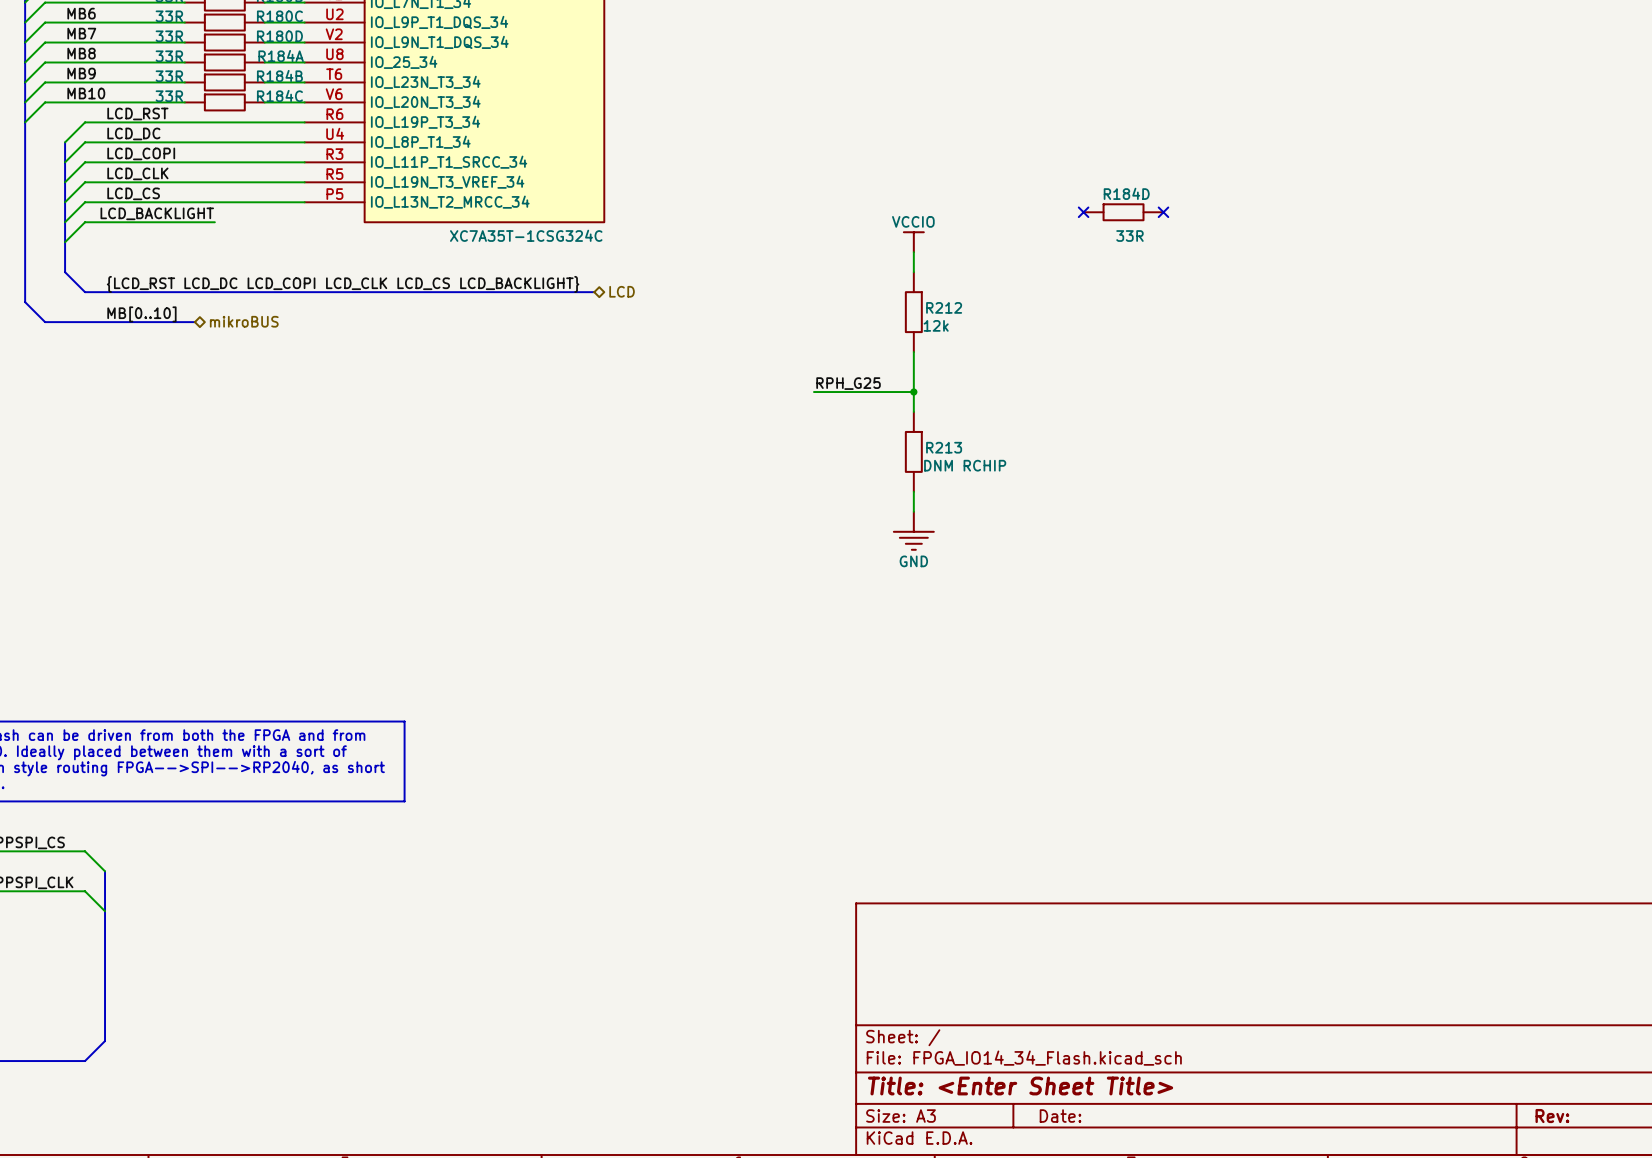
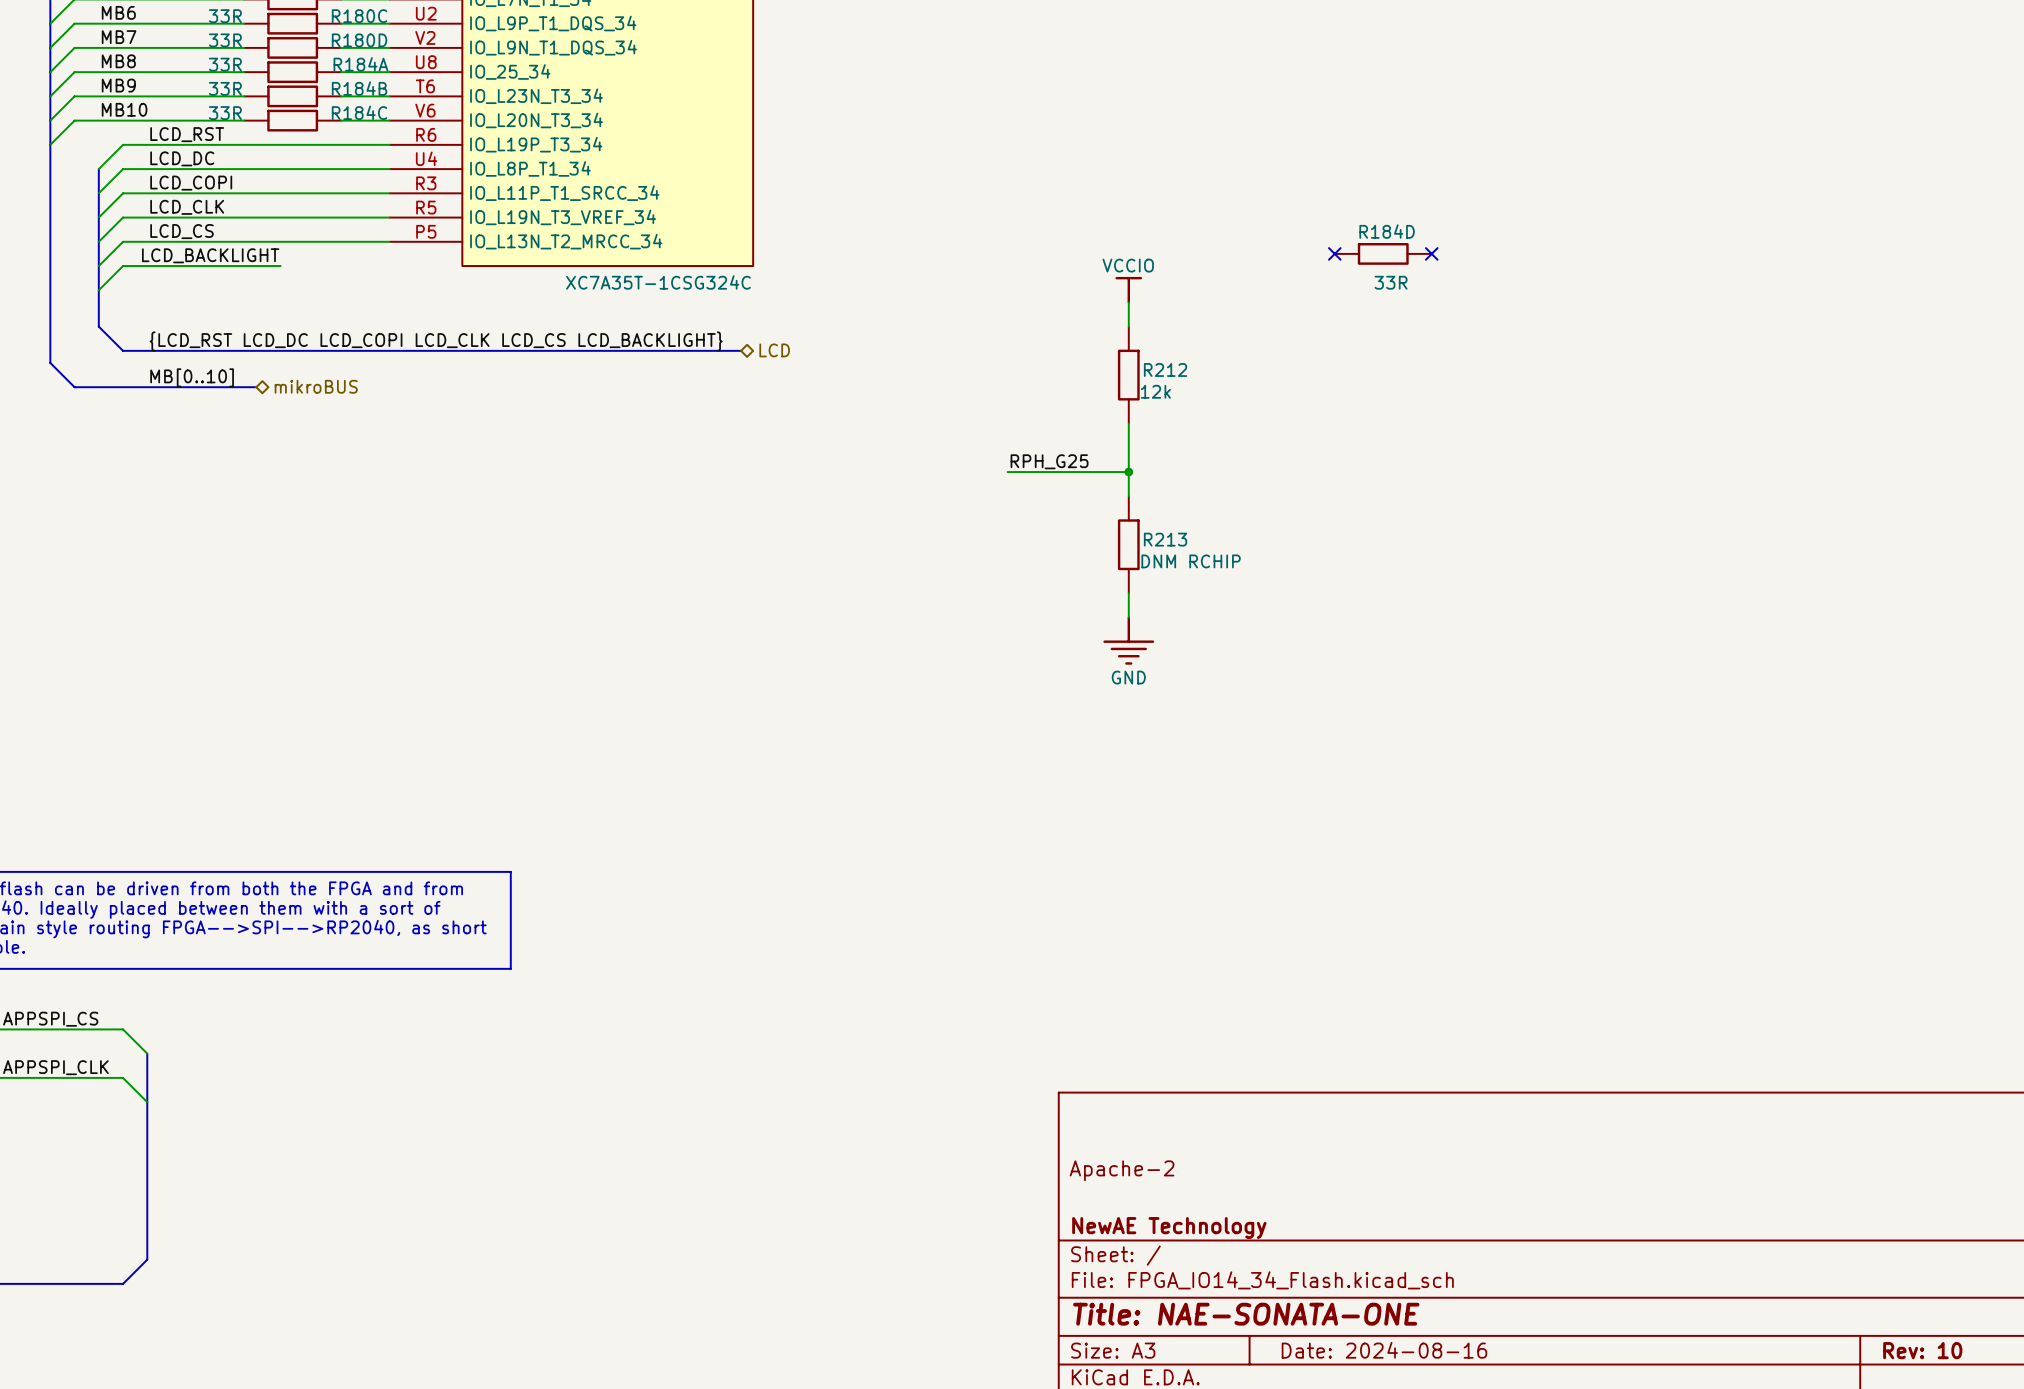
title block: none -> Apache-2 (1122, 1170)
title block: none -> NewAE Technology (1169, 1228)
title block: Title: <Enter Sheet Title> (1020, 1086) -> Title: NAE-SONATA-ONE (1246, 1314)
title block: Date: (1060, 1116) -> Date: 2024-08-16 (1384, 1350)
title block: Rev: (1552, 1116) -> Rev: 10 (1922, 1350)

